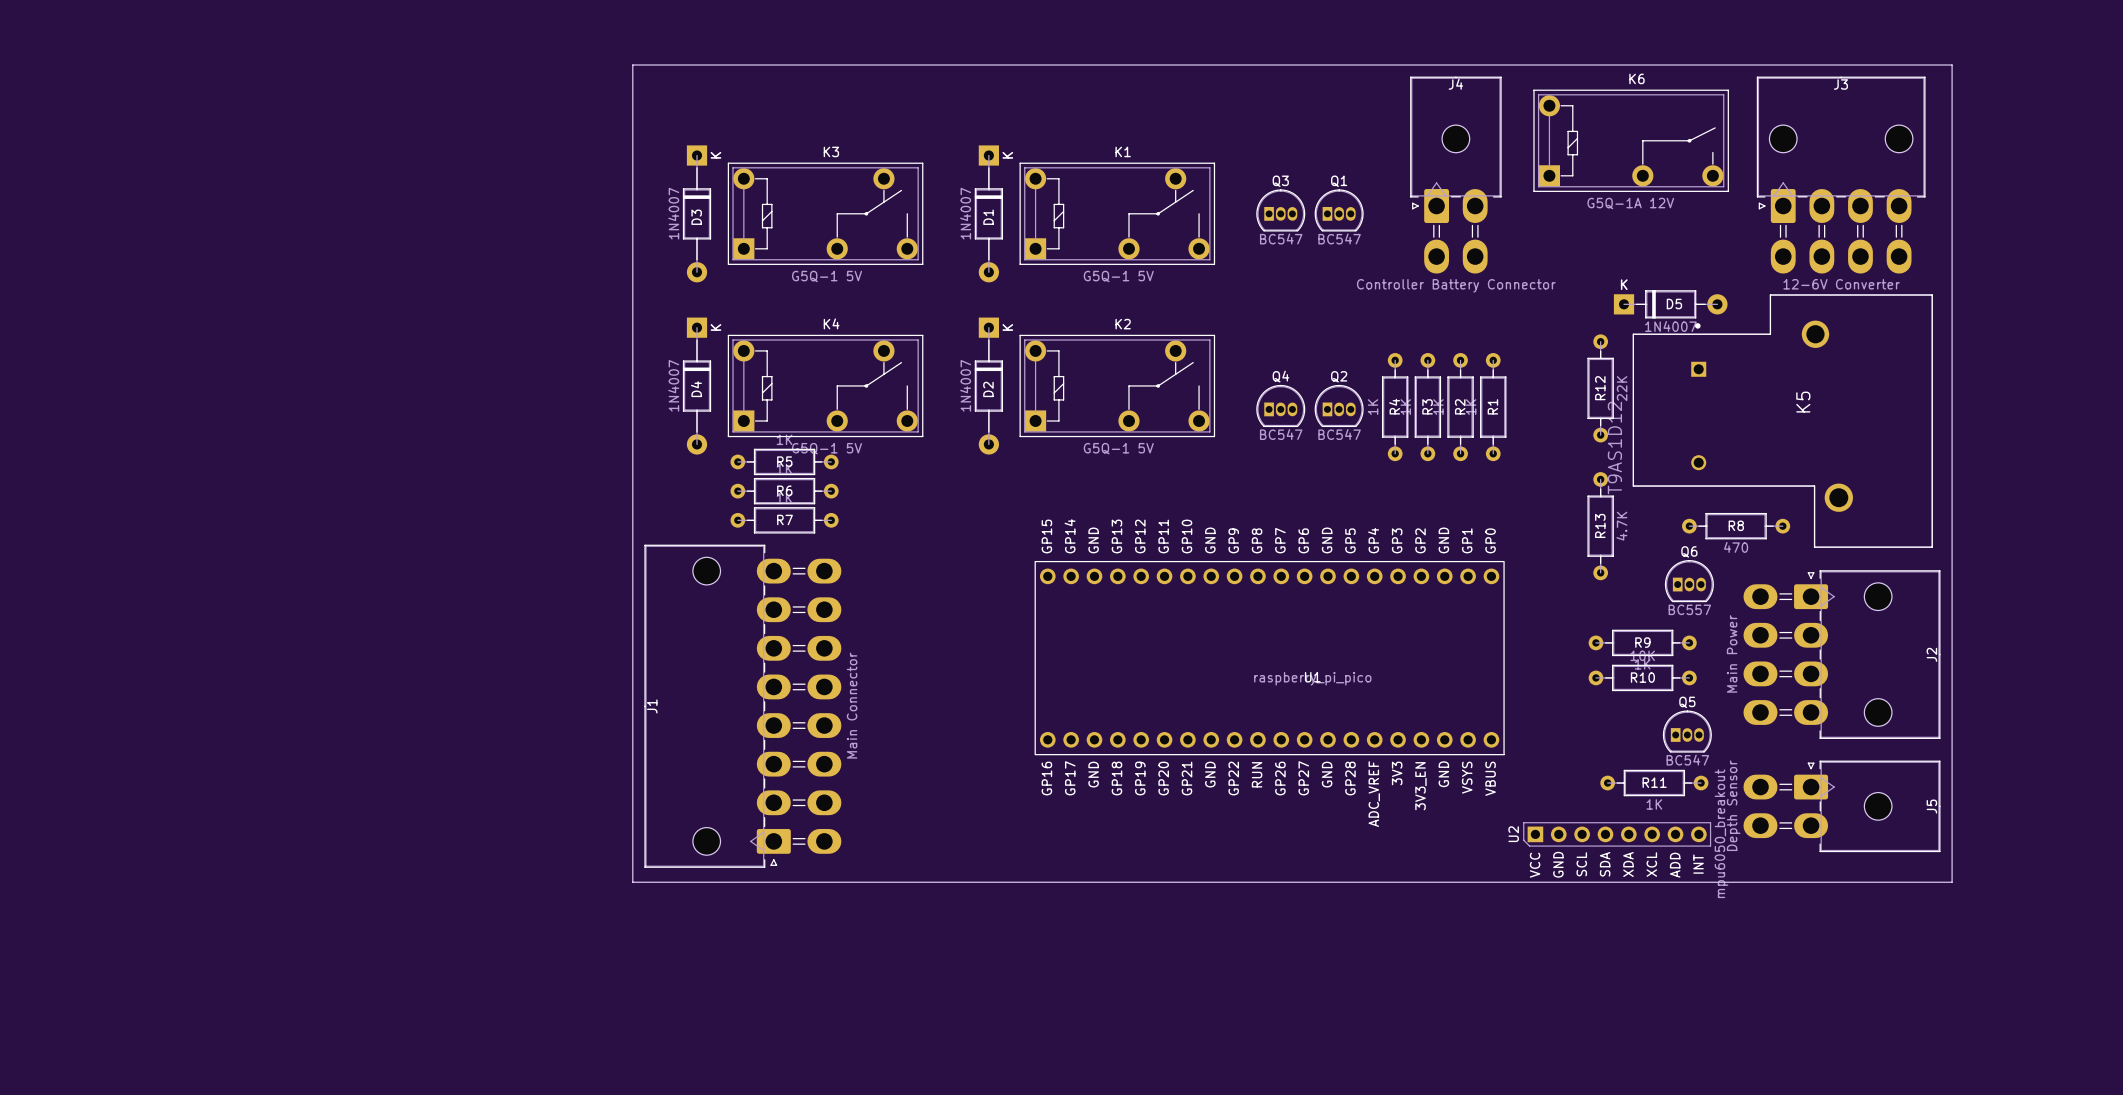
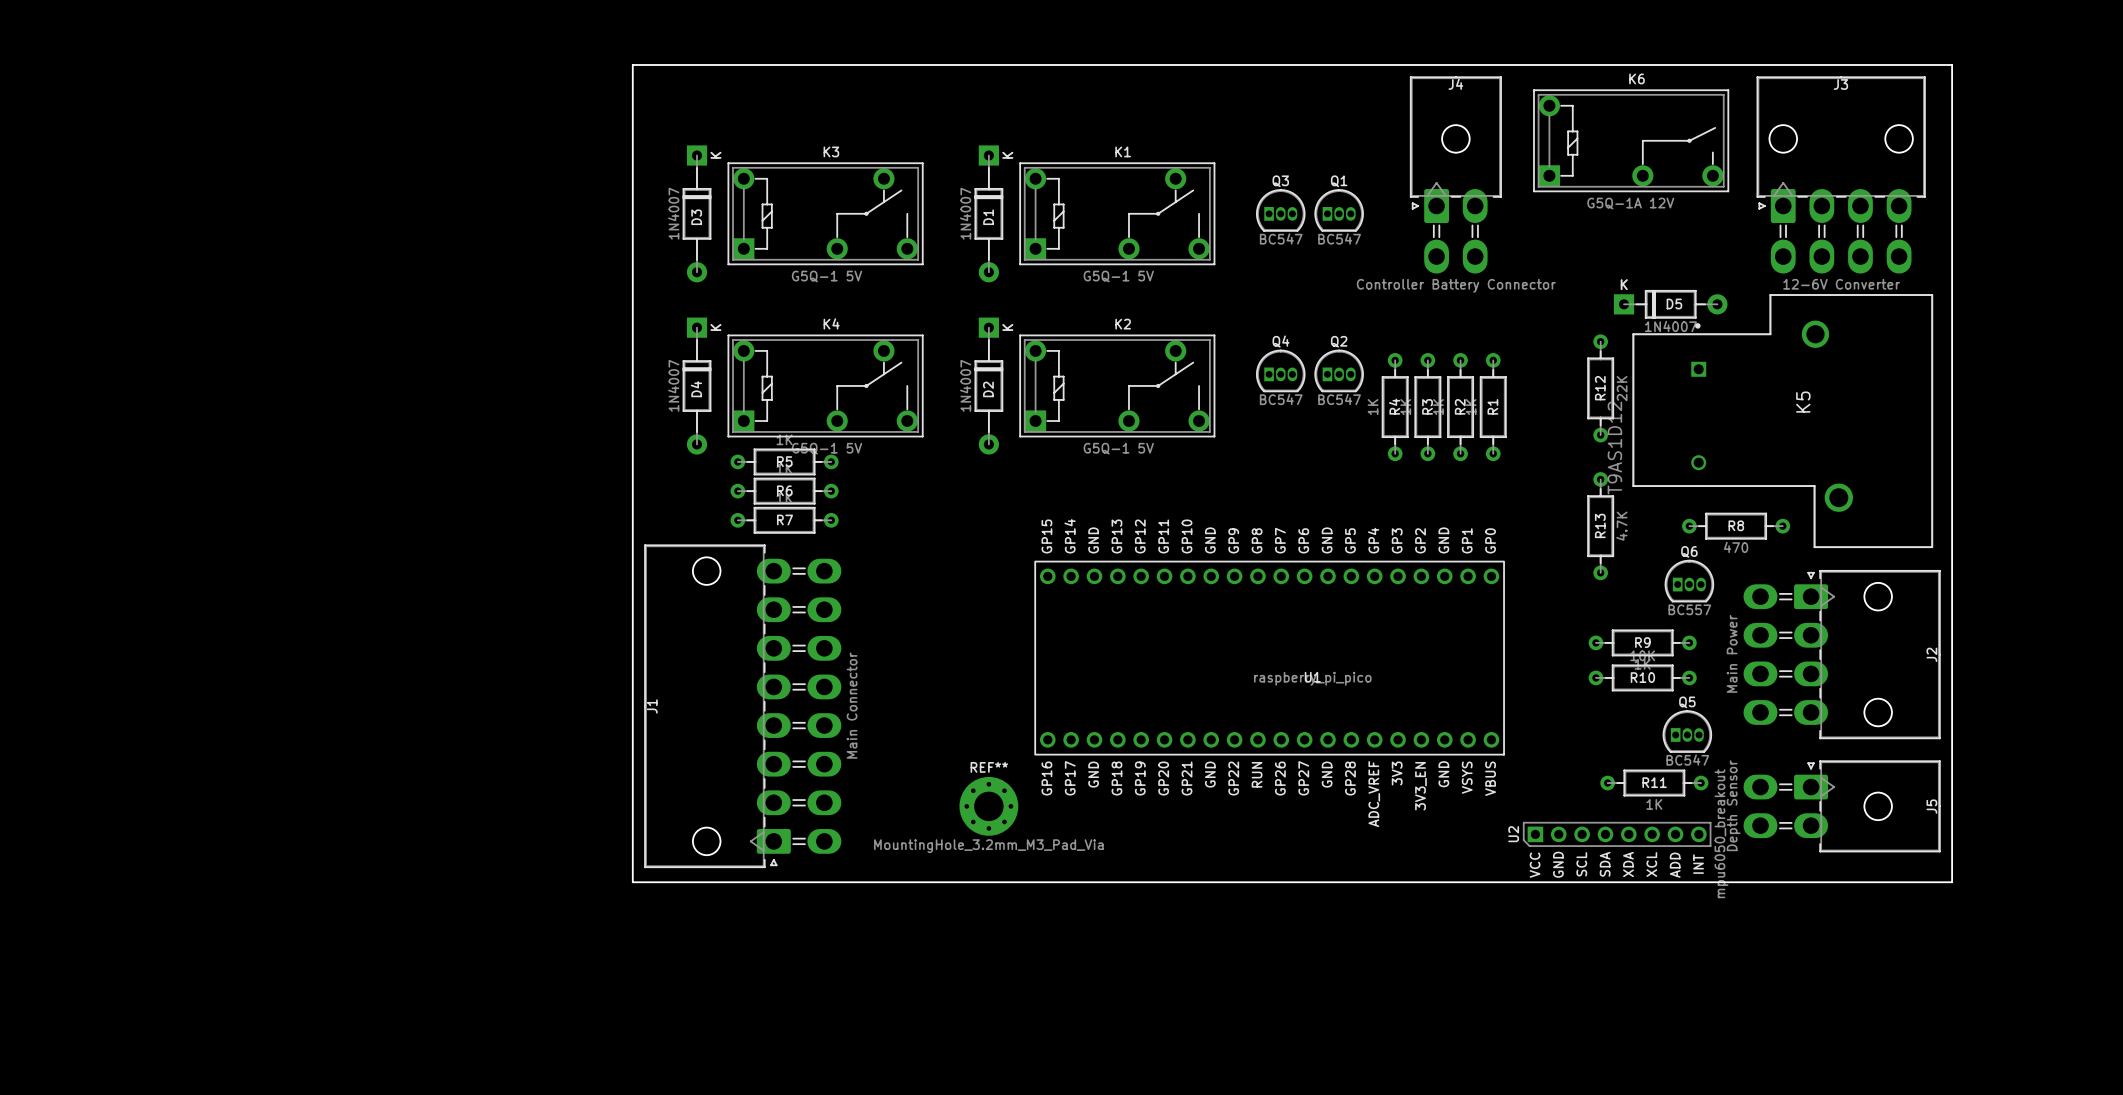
Q4 position: (1280, 405) -> (1280, 370)
Q2 position: (1339, 405) -> (1339, 370)
REF**: none -> MountingHole_3.2mm_M3_Pad_Via (988, 806)

